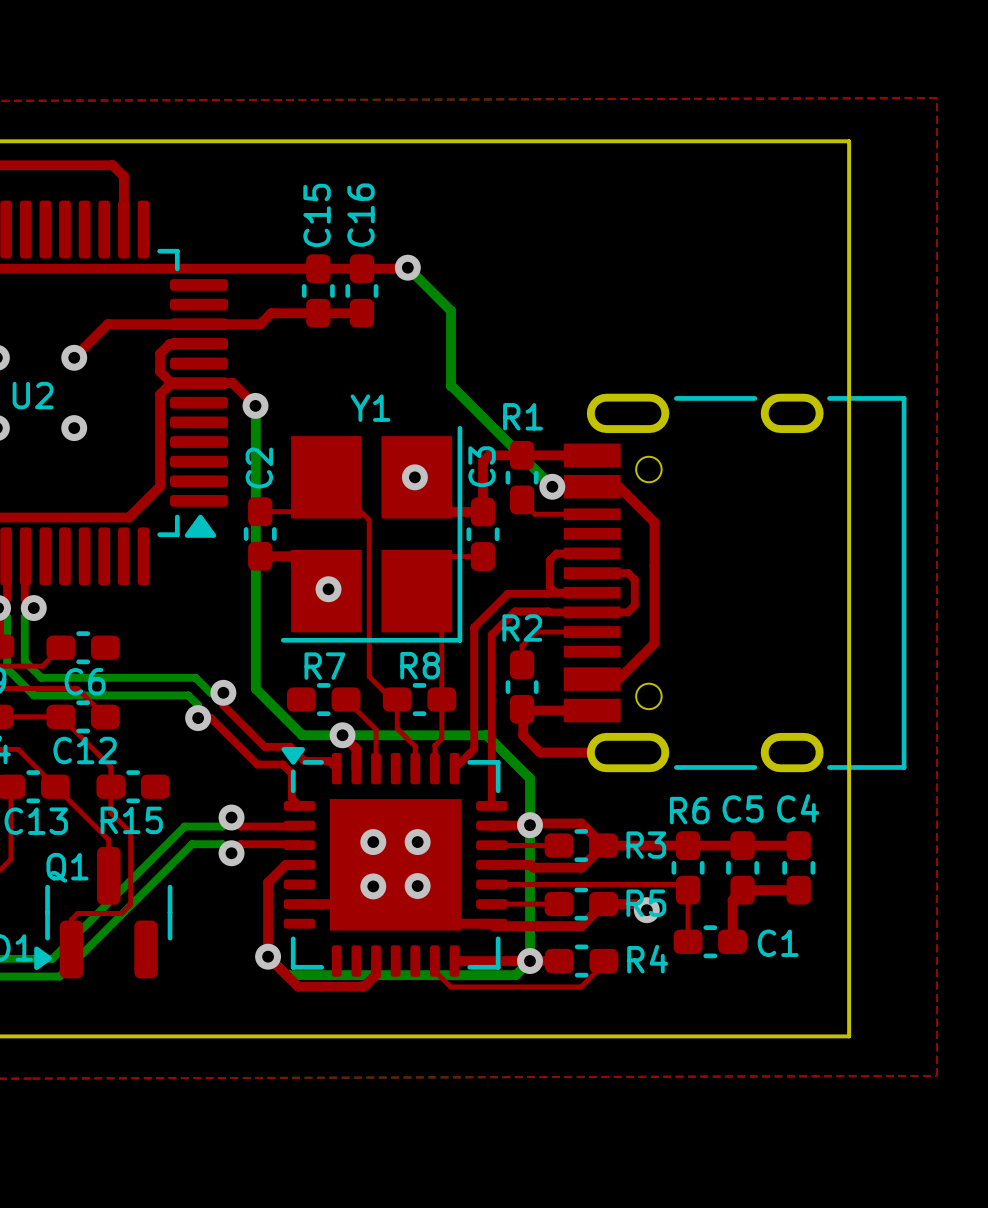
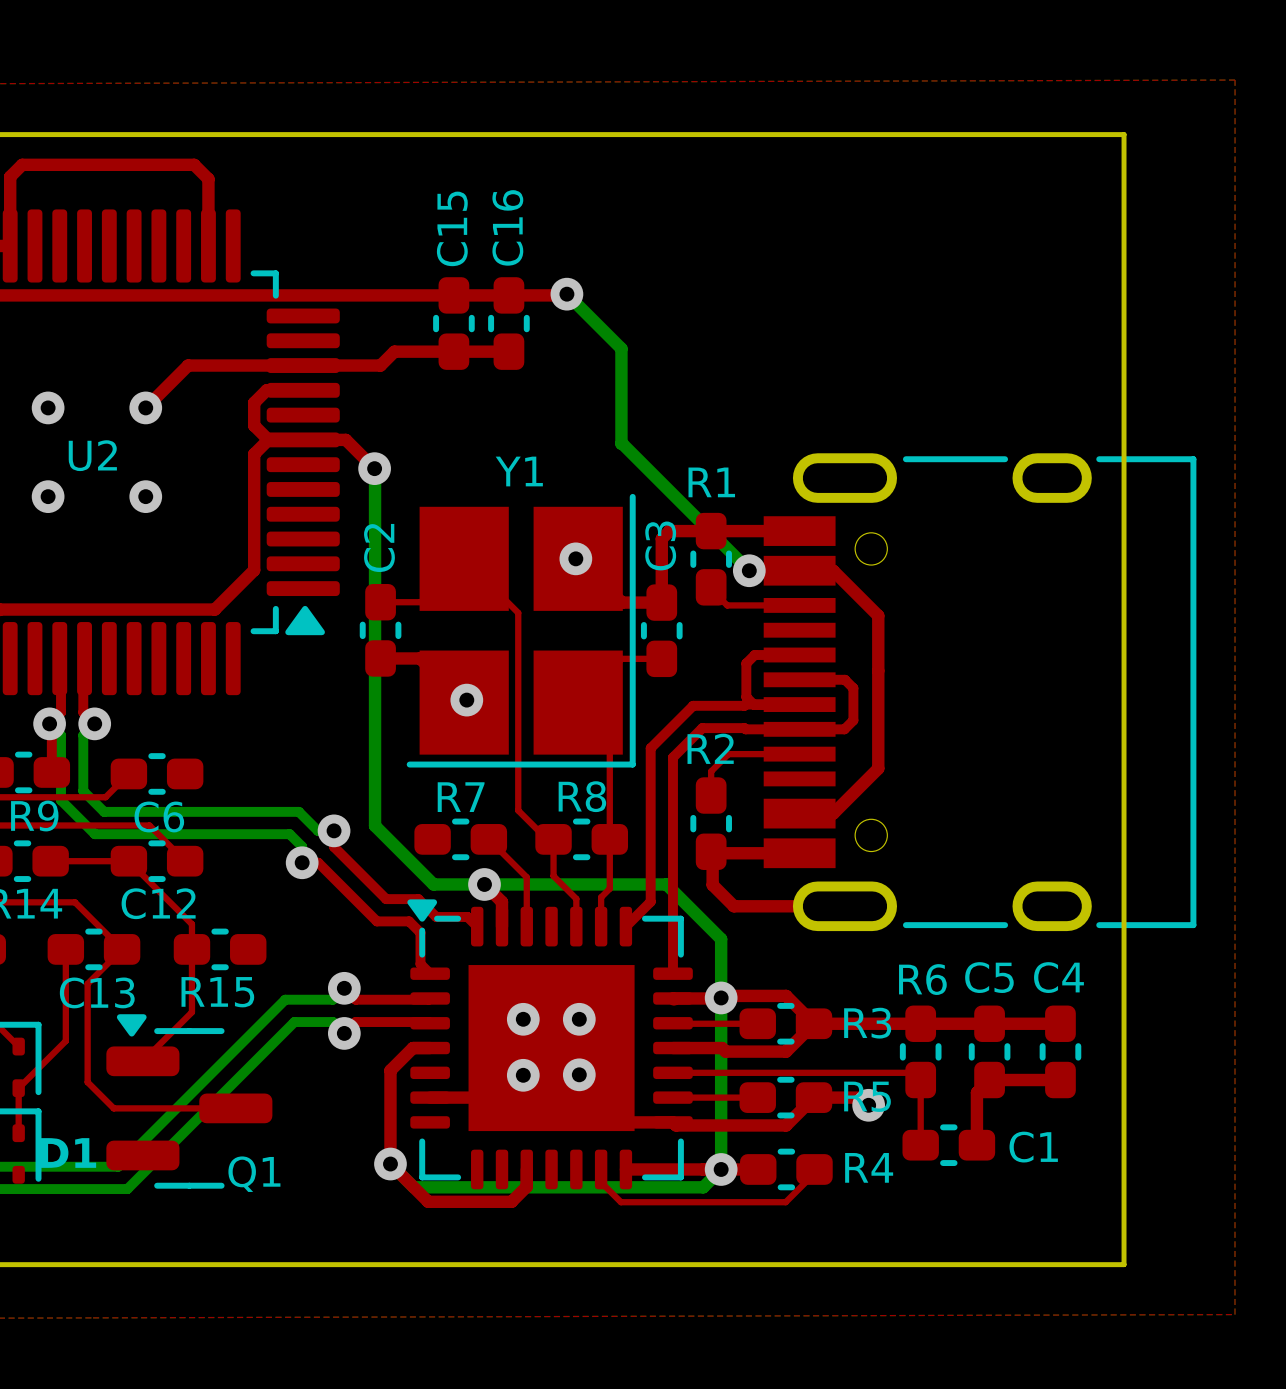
top track: (55, 786) (108, 840) (108, 875) -> (122, 949) (87, 983) (87, 1082) (113, 1108) (235, 1108)
top track: (110, 812) (130, 832) (130, 904) -> (191, 982) (191, 1012) (142, 1061)
Q1 name position: Q1 (67, 867) -> Q1 (254, 1174)
Q1 rotation: 0° (103, 912) -> 90° clockwise (189, 1101)
top track: (121, 913) (77, 913) (71, 919) (71, 949) -> none

